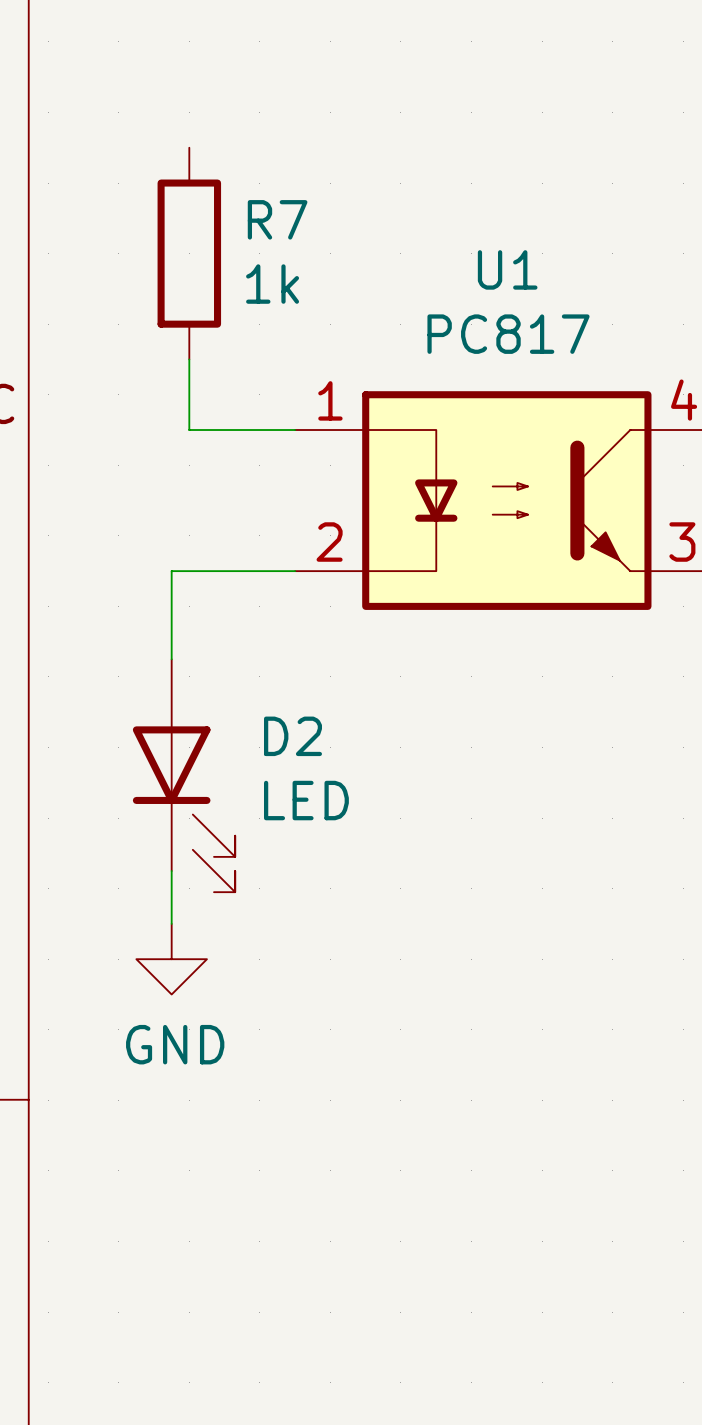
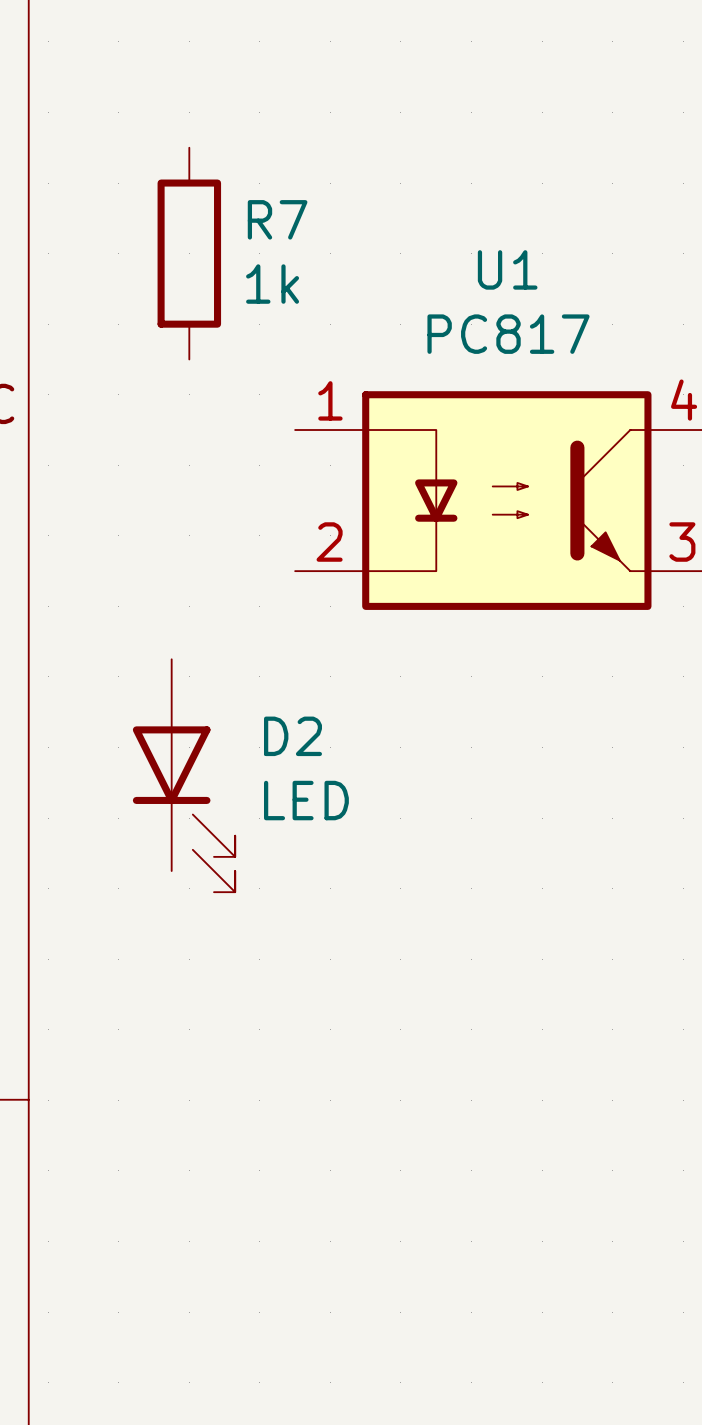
wire: (189, 359) (189, 430) (295, 430) -> none
wire: (295, 571) (171, 571) (171, 659) -> none
wire: (171, 871) (171, 923) -> none
power symbol: GND (171, 959) -> none

